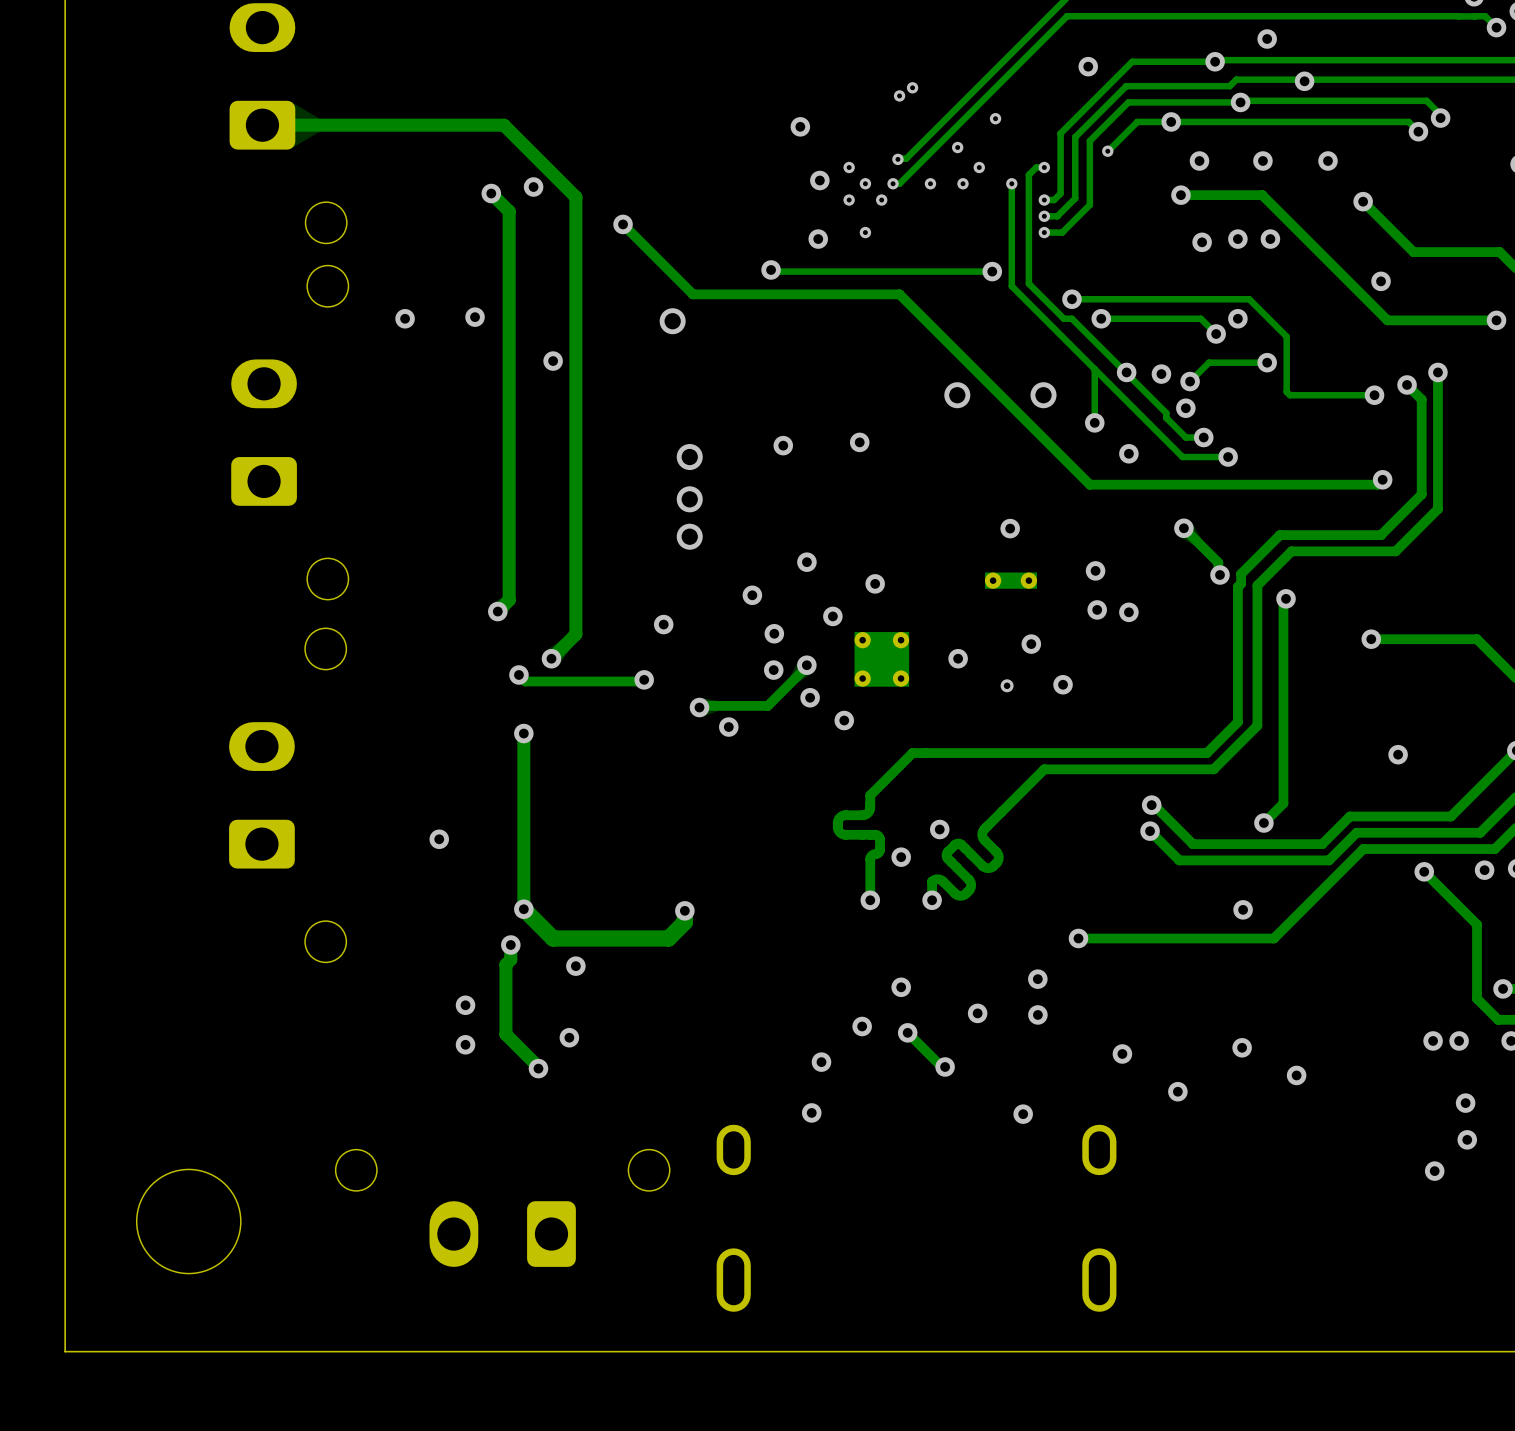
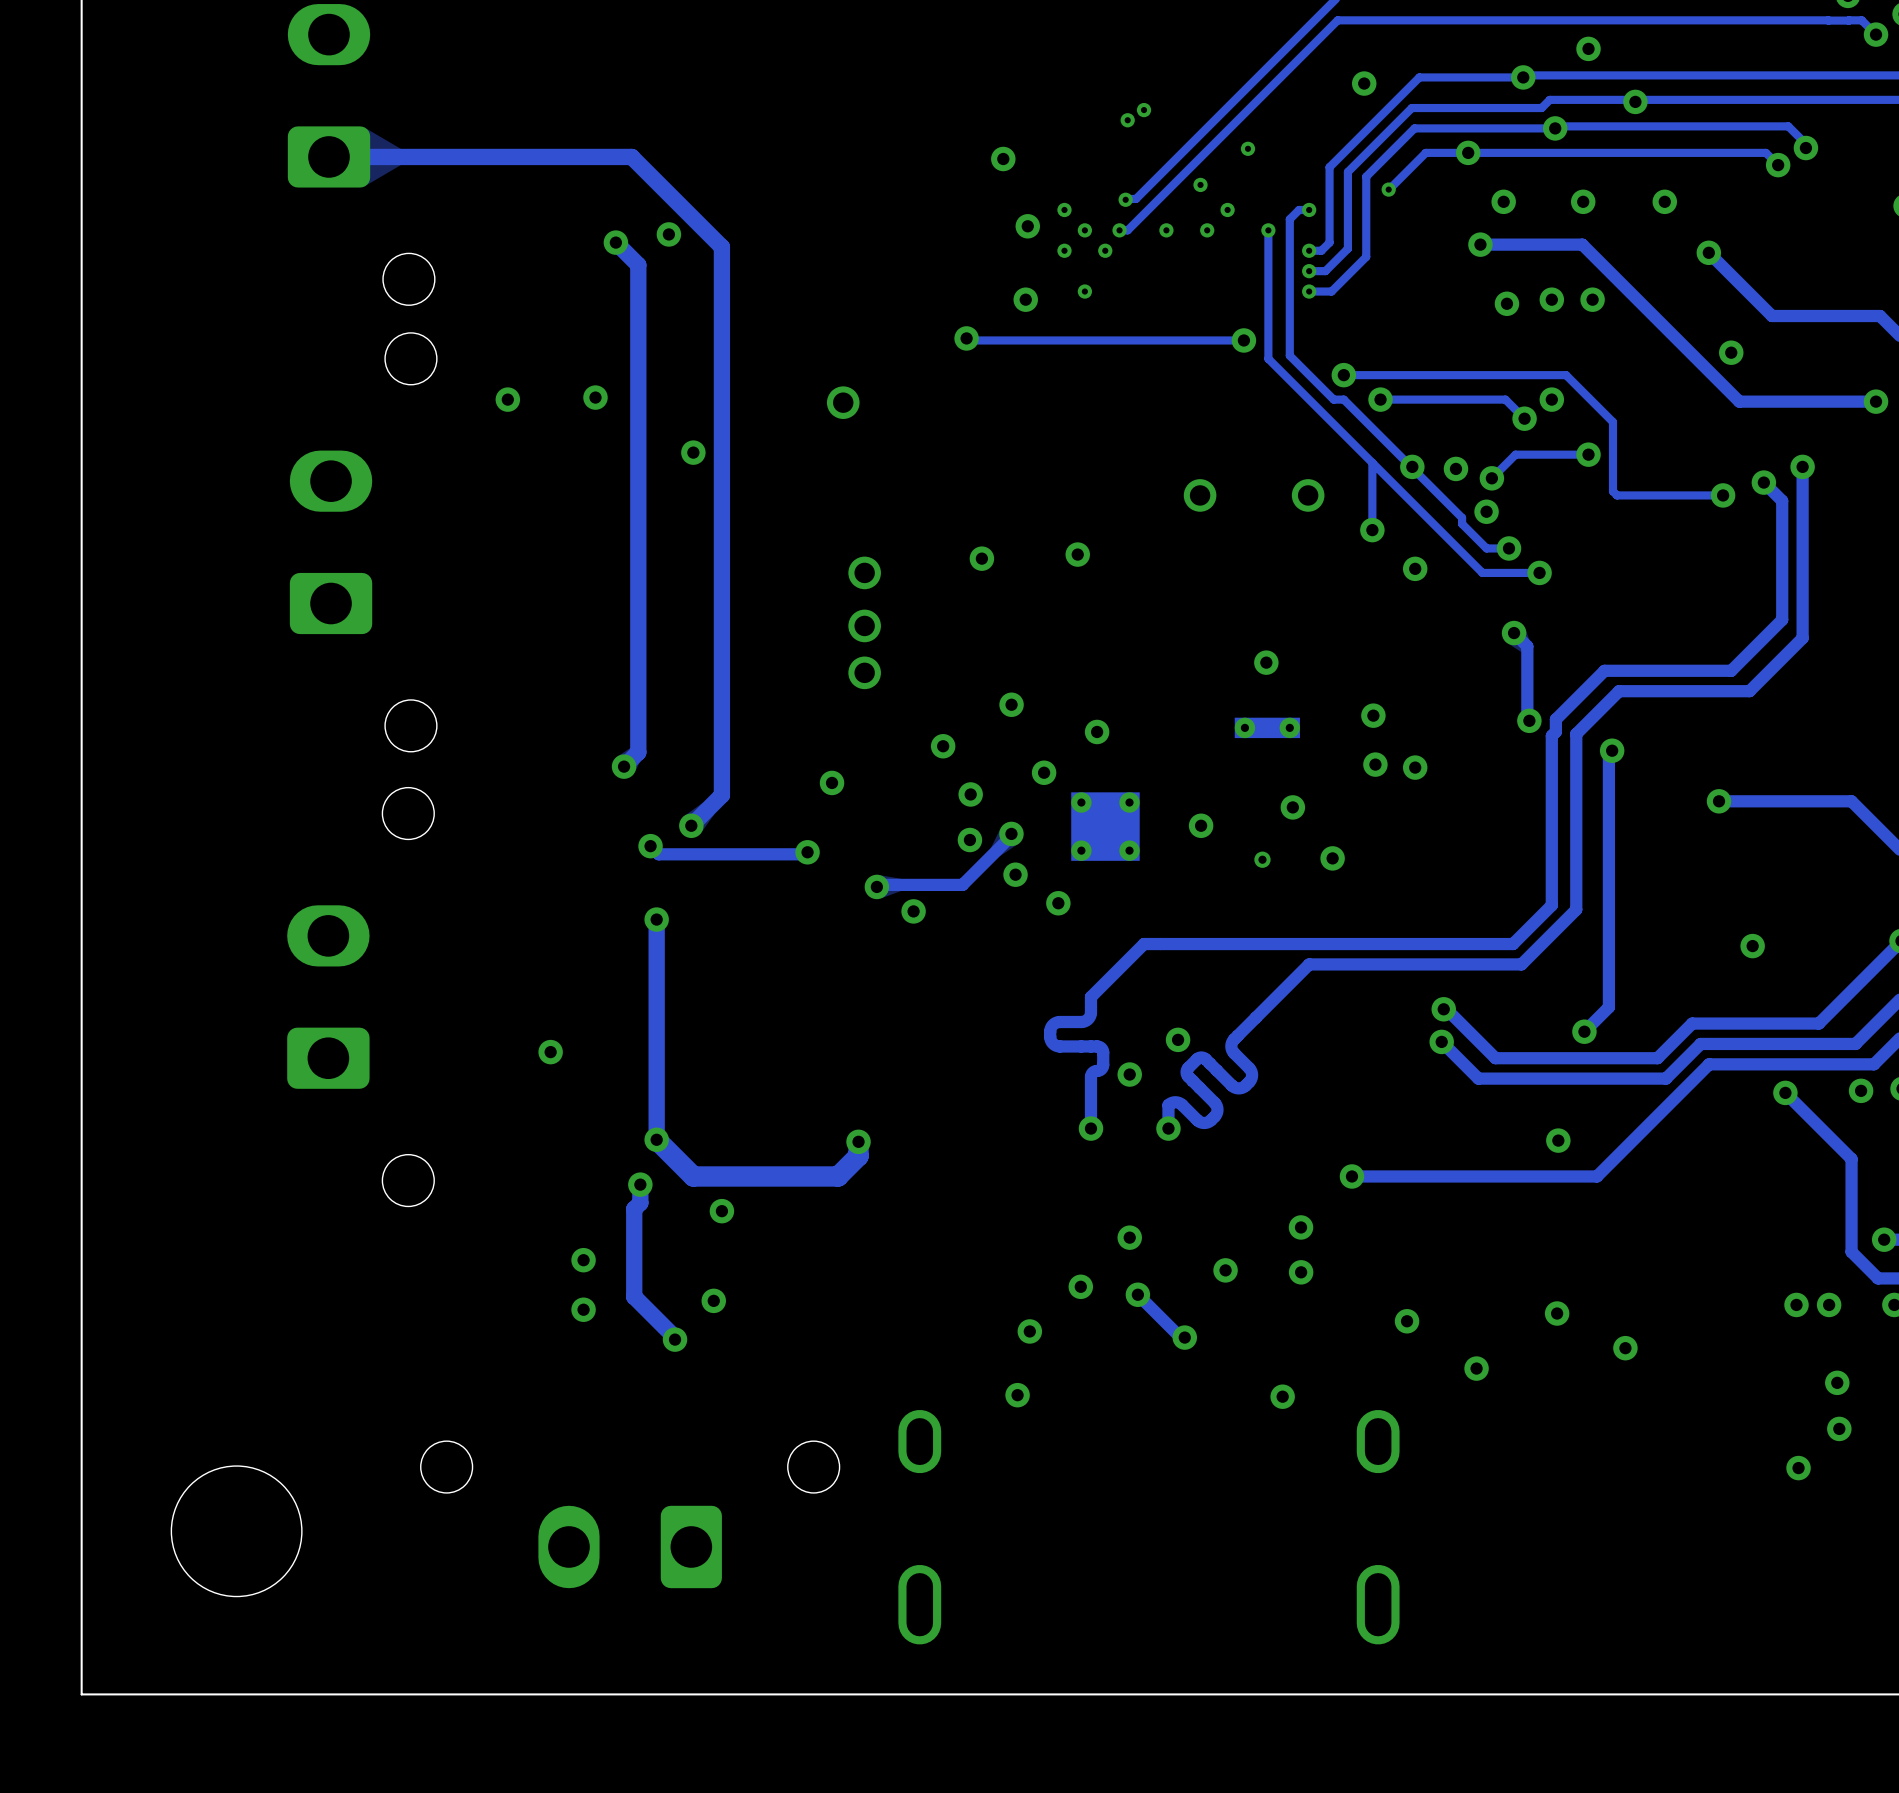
track: (623, 224) (692, 294) (899, 294) (1089, 484) (1377, 484) (1382, 479) (1379, 479) -> none
via: (623, 224) -> none
via: (1382, 479) -> none
track: (1183, 528) (1218, 562) -> (1514, 633) (1527, 646) (1527, 705)
via position: (1183, 528) -> (1514, 633)

